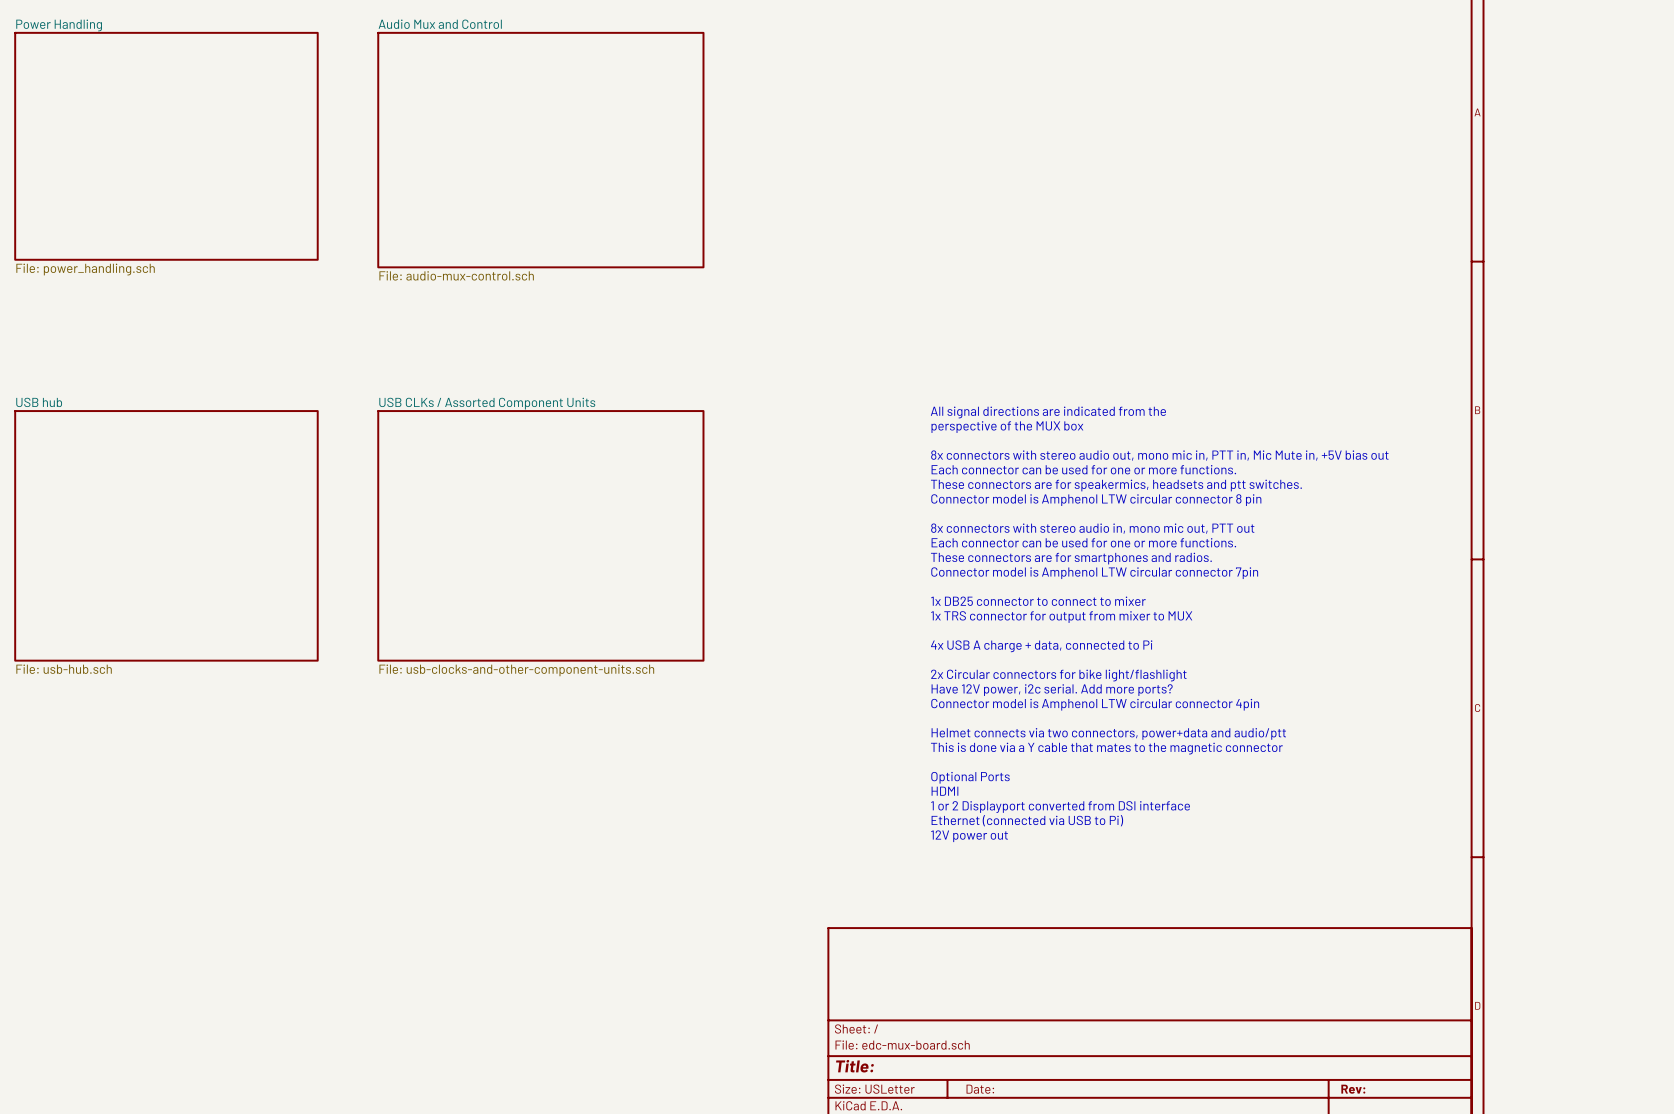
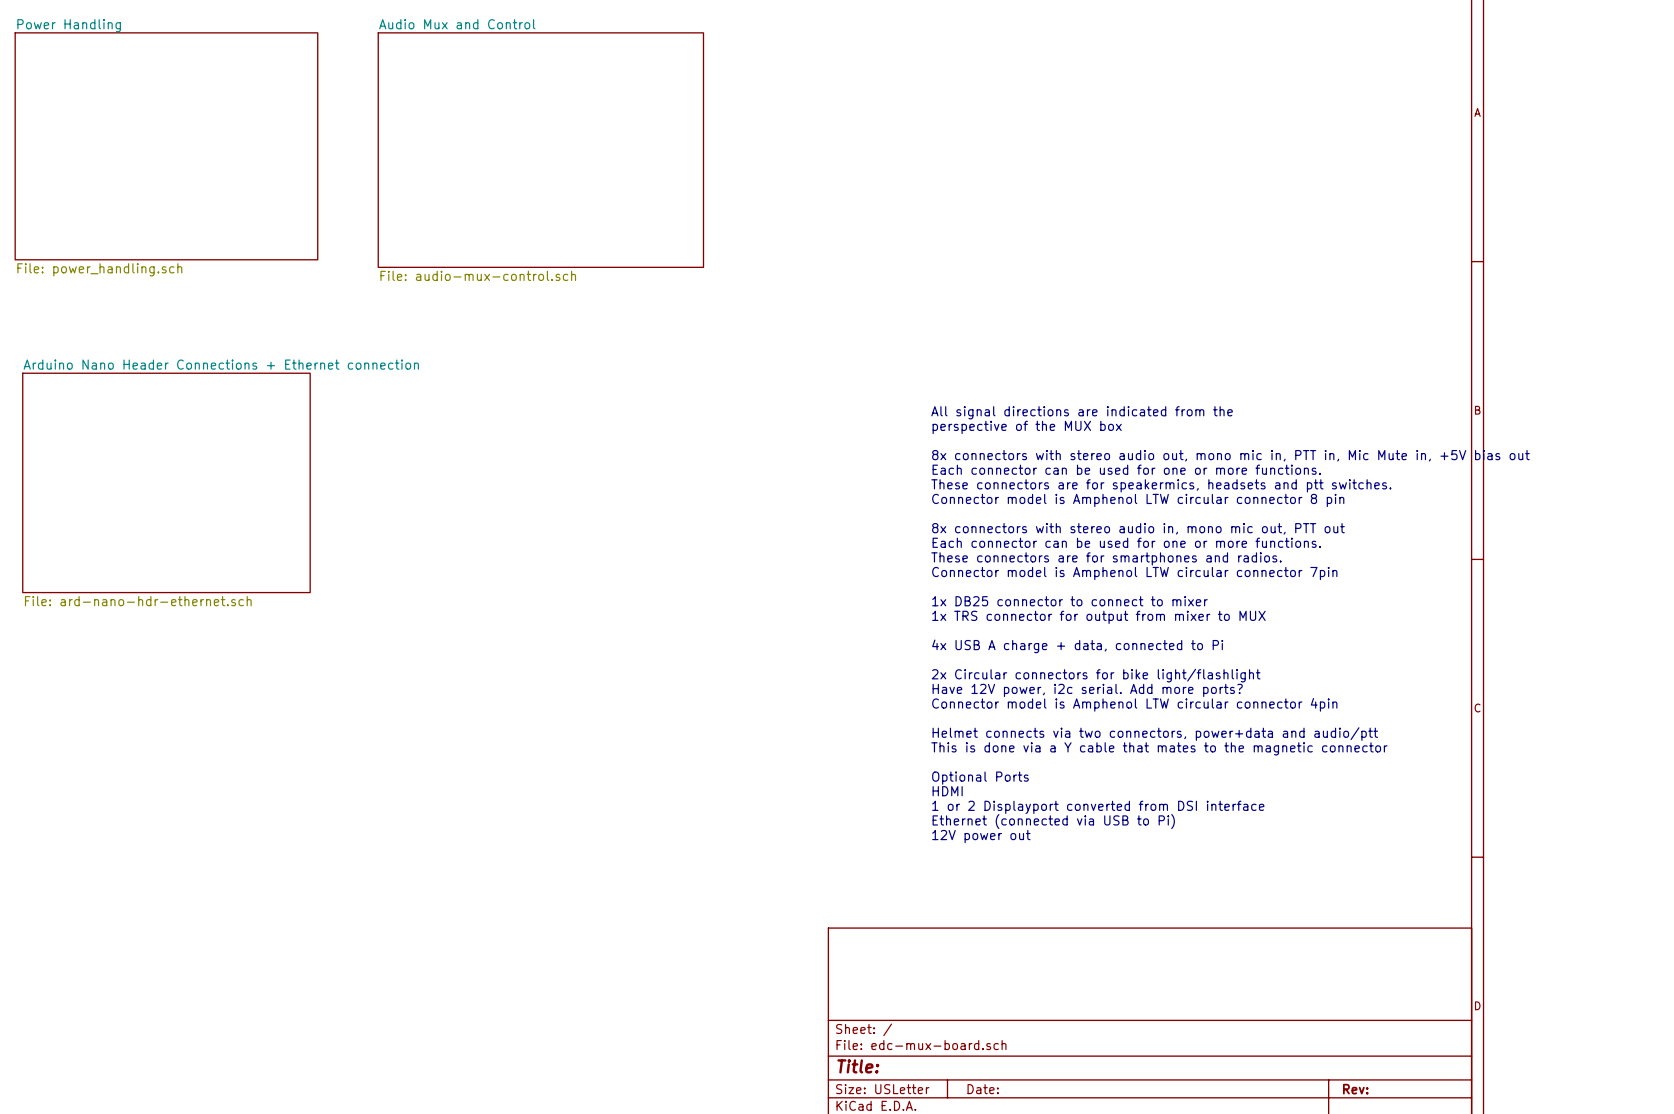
sheet Arduino Nano Header Connections + Ethernet connection: none -> File: ard-nano-hdr-ethernet.sch (166, 482)
sheet USB hub: File: usb-hub.sch (166, 535) -> none
sheet USB CLKs / Assorted Component Units: File: usb-clocks-and-other-component-units.sch (540, 535) -> none

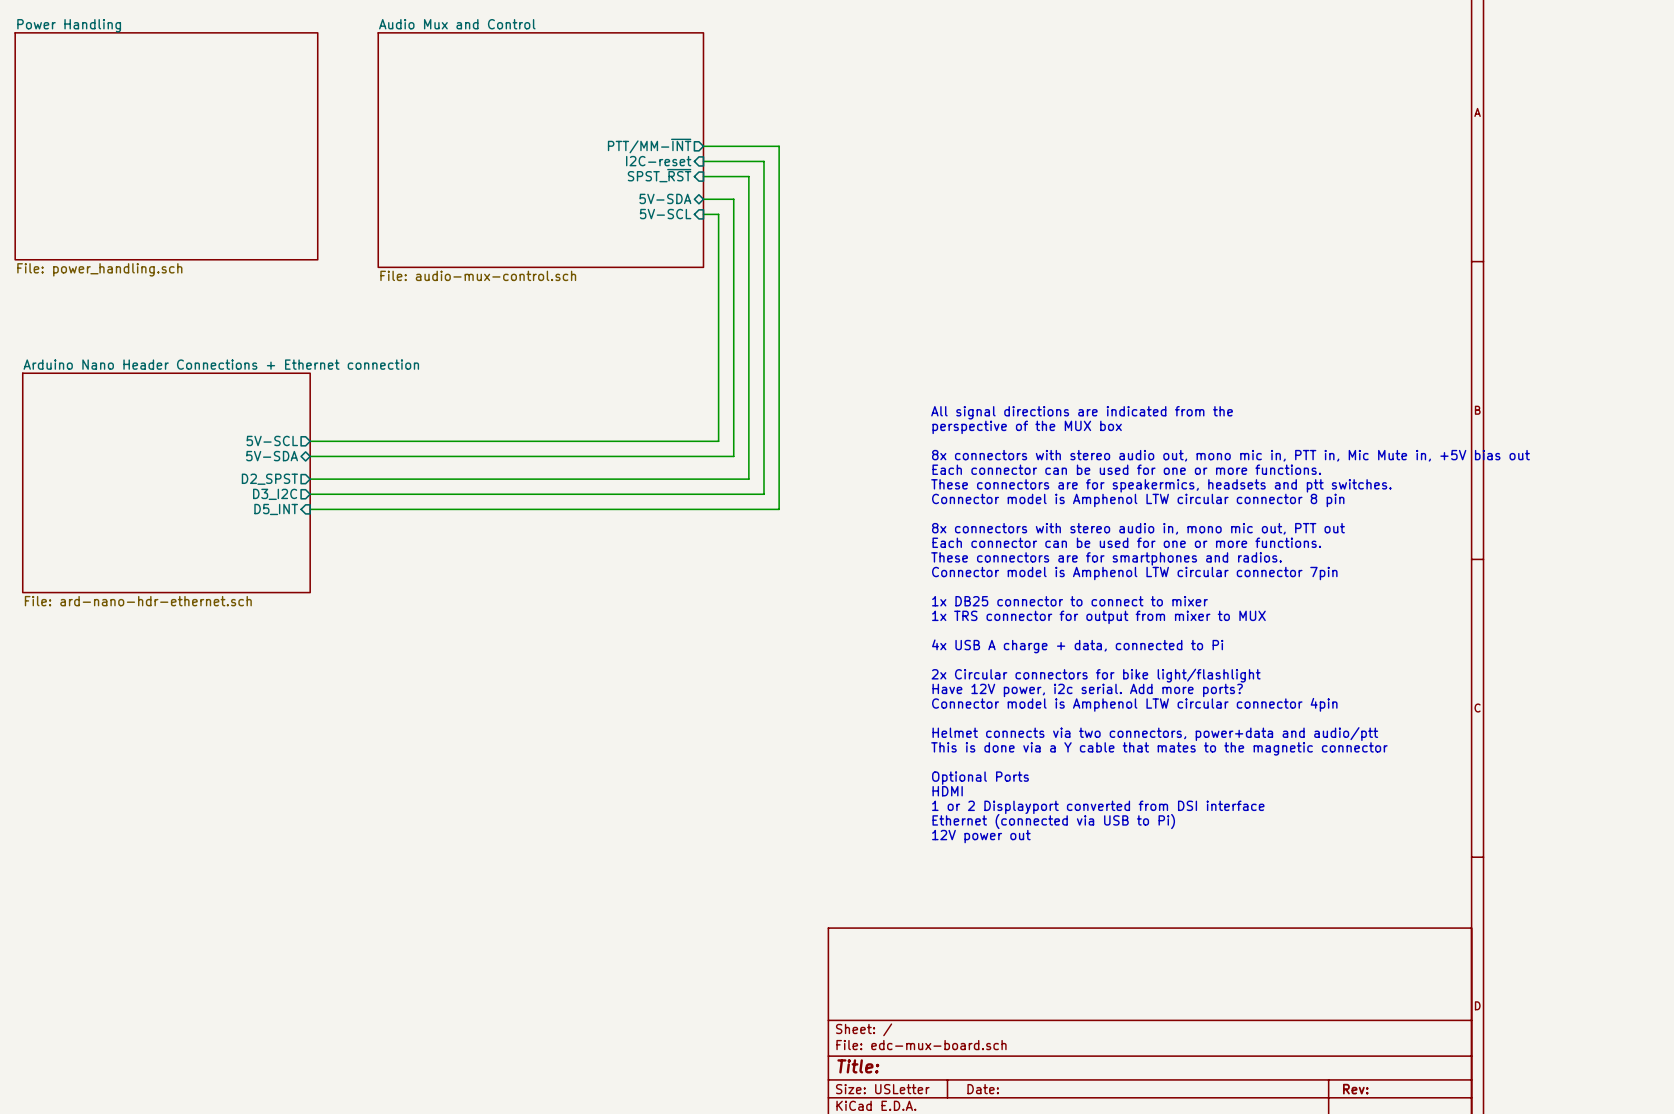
sheet pin: none -> PTT/MM-~{INT} (649, 146)
wire: none -> (703, 146) (779, 146) (779, 509) (310, 509)
sheet pin: none -> I2C-reset (658, 161)
wire: none -> (703, 161) (763, 161) (763, 494) (310, 494)
sheet pin: none -> SPST_~{RST} (659, 175)
wire: none -> (703, 176) (748, 176) (748, 479) (310, 479)
sheet pin: none -> 5V-SDA (665, 198)
wire: none -> (703, 199) (733, 199) (733, 456) (310, 456)
sheet pin: none -> 5V-SCL (665, 214)
wire: none -> (703, 214) (718, 214) (718, 441) (310, 441)
sheet pin: none -> 5V-SCL (272, 440)
sheet pin: none -> 5V-SDA (272, 456)
sheet pin: none -> D2_SPST (269, 479)
sheet pin: none -> D3_I2C (275, 494)
sheet pin: none -> D5_INT (276, 509)

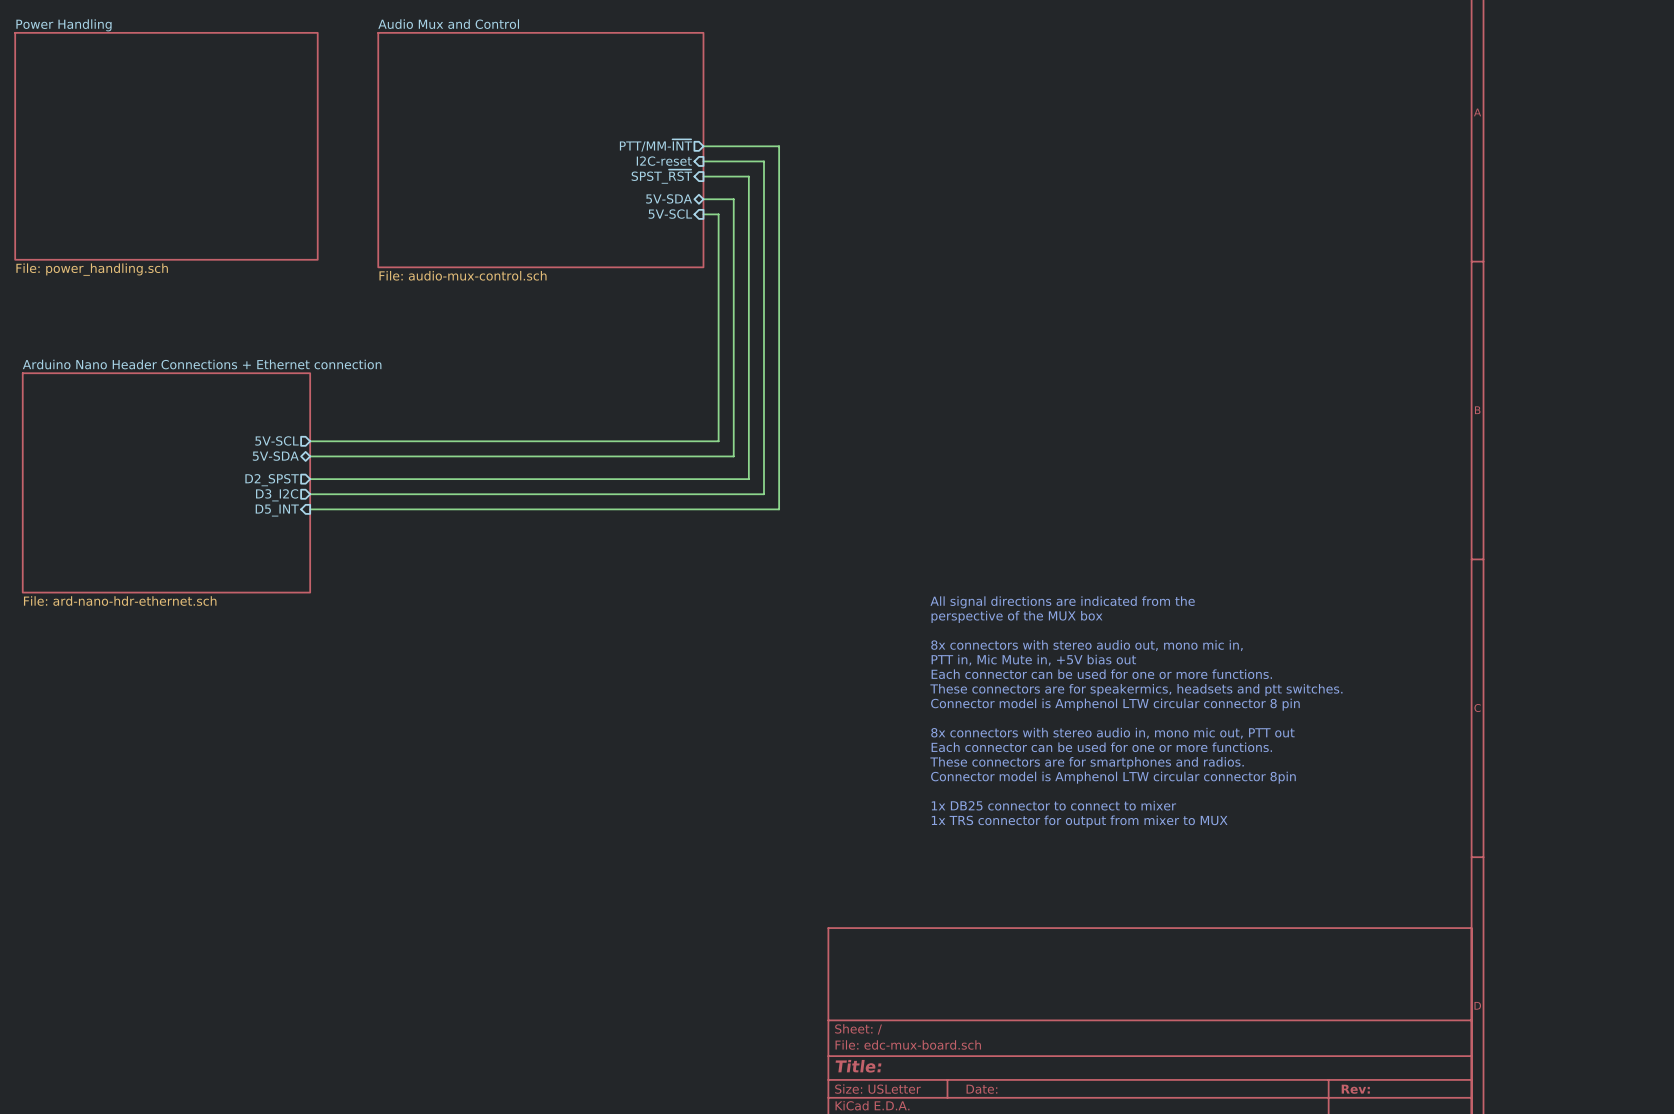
text: All signal directions are indicated from the (1082, 412) -> none
text: perspective of the MUX box (1027, 427) -> none
text: 8x connectors with stereo audio out, mono mic in, PTT in, Mic Mute in, +5V bias out (1230, 455) -> none
text: Each connector can be used for one or more functions. (1126, 469) -> none
text: These connectors are for speakermics, headsets and ptt switches. (1161, 485) -> none
text: Connector model is Amphenol LTW circular connector 8 pin (1138, 500) -> none
text: 8x connectors with stereo audio in, mono mic out, PTT out (1138, 528) -> none
text: Each connector can be used for one or more functions. (1126, 542) -> none
text: These connectors are for smartphones and radios. (1106, 558) -> none
text: Connector model is Amphenol LTW circular connector 7pin (1134, 573) -> none
text: 1x DB25 connector to connect to mixer (1069, 601) -> All signal directions are indicated from the (1062, 602)
text: 1x TRS connector for output from mixer to MUX (1098, 617) -> perspective of the MUX box (1016, 616)
text: 4x USB A charge + data, connected to Pi (1077, 646) -> 8x connectors with stereo audio out, mono mic in, (1086, 645)
text: none -> PTT in, Mic Mute in, +5V bias out (1033, 660)
text: 2x Circular connectors for bike light/flashlight (1096, 675) -> Each connector can be used for one or more functions. (1101, 674)
text: Have 12V power, i2c serial. Add more ports? (1087, 690) -> These connectors are for speakermics, headsets and ptt switches. (1136, 690)
text: Connector model is Amphenol LTW circular connector 4pin (1134, 704) -> Connector model is Amphenol LTW circular connector 8 pin (1115, 704)
text: Helmet connects via two connectors, power+data and audio/ptt (1155, 734) -> 8x connectors with stereo audio in, mono mic out, PTT out (1112, 733)
text: This is done via a Y cable that mates to the magnetic connector (1159, 748) -> Each connector can be used for one or more functions. (1101, 747)
text: none -> These connectors are for smartphones and radios. (1087, 763)
text: Optional Ports (980, 778) -> Connector model is Amphenol LTW circular connector 8pin (1113, 777)
text: HDMI (947, 791) -> none
text: 1 or 2 Displayport converted from DSI interface (1098, 807) -> 1x DB25 connector to connect to mixer (1053, 805)
text: Ethernet (connected via USB to Pi) (1053, 821) -> 1x TRS connector for output from mixer to MUX (1079, 821)
text: 12V power out (981, 836) -> none

